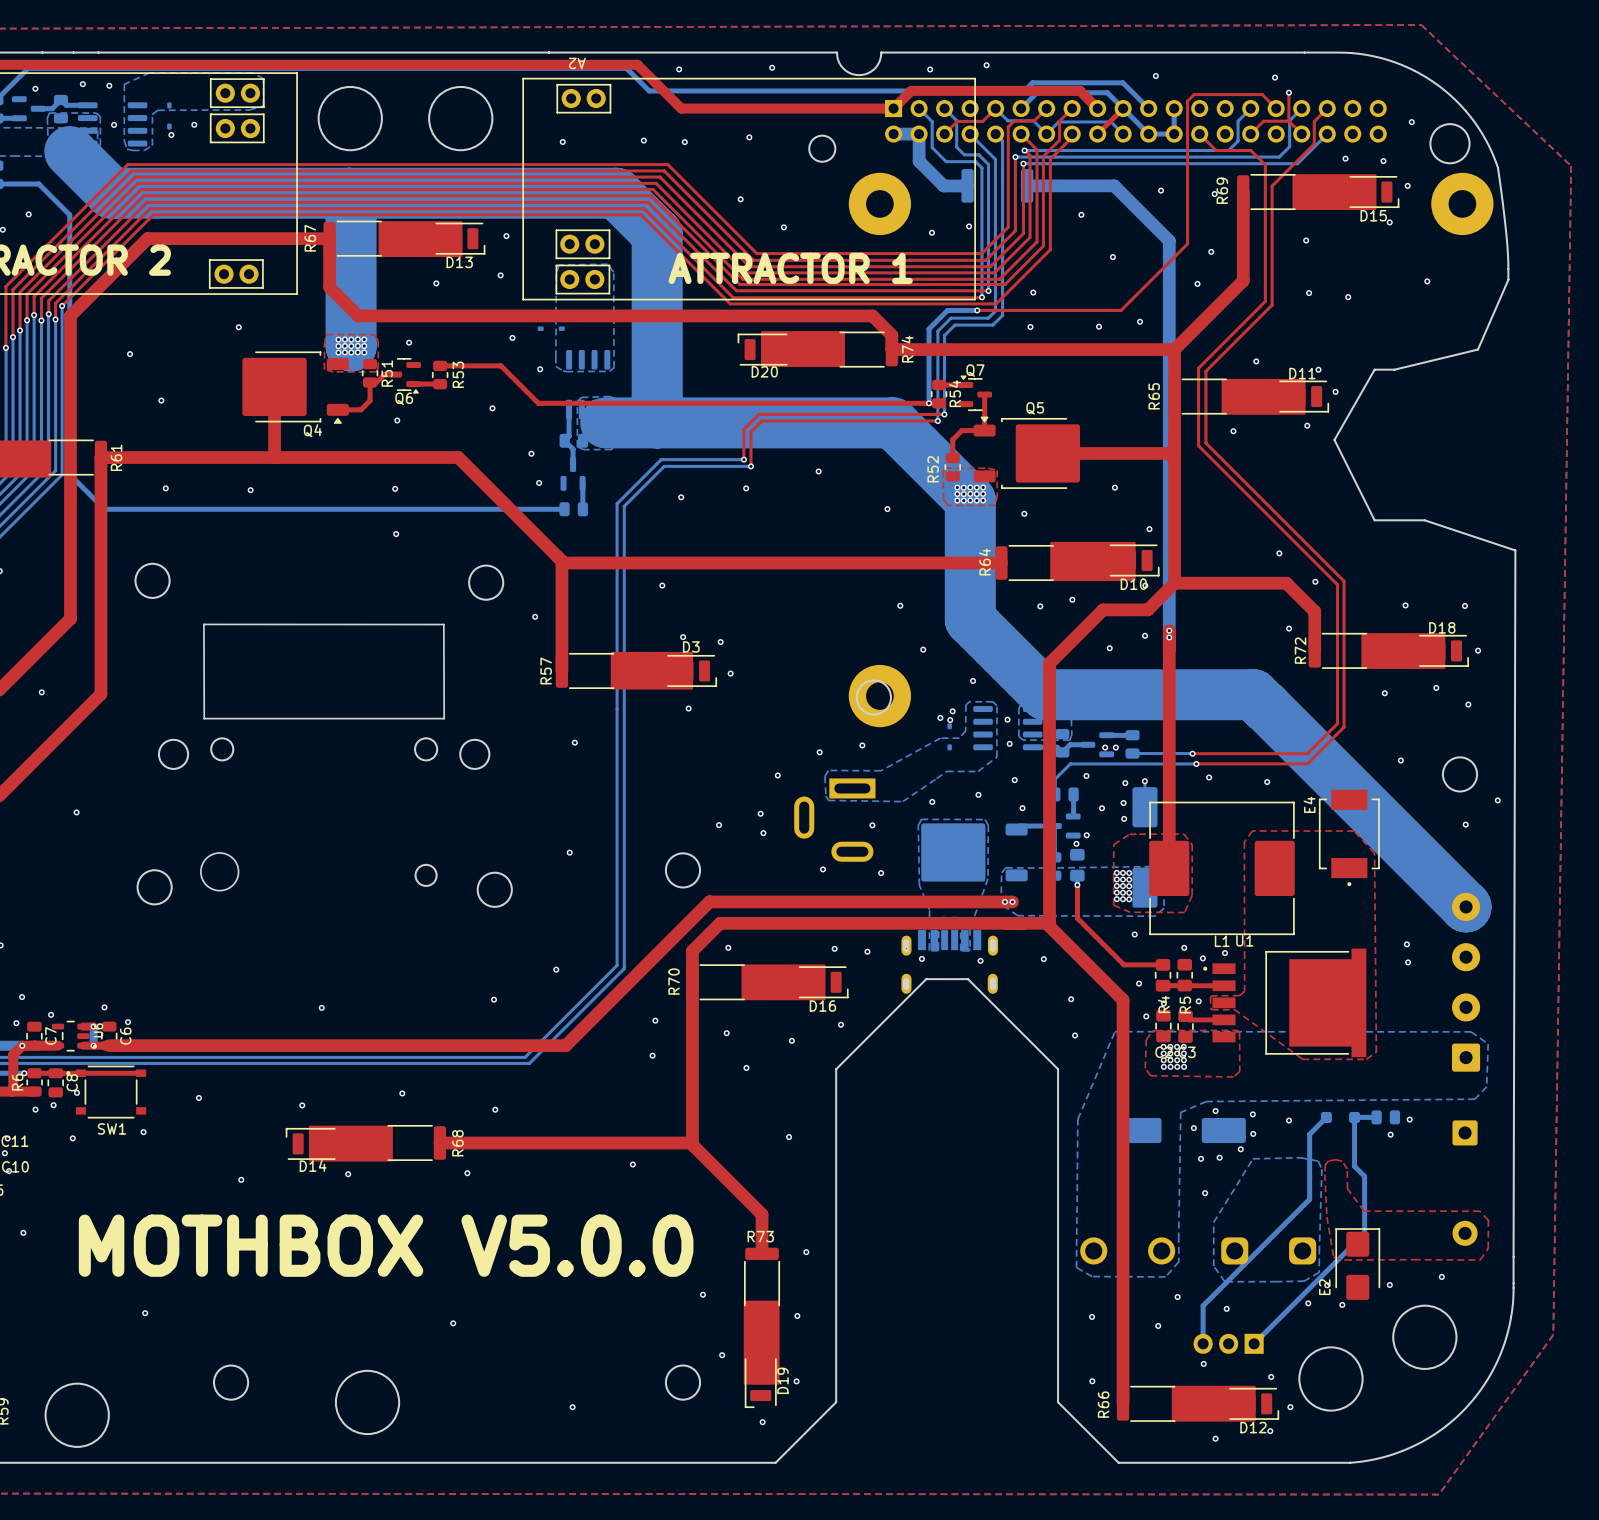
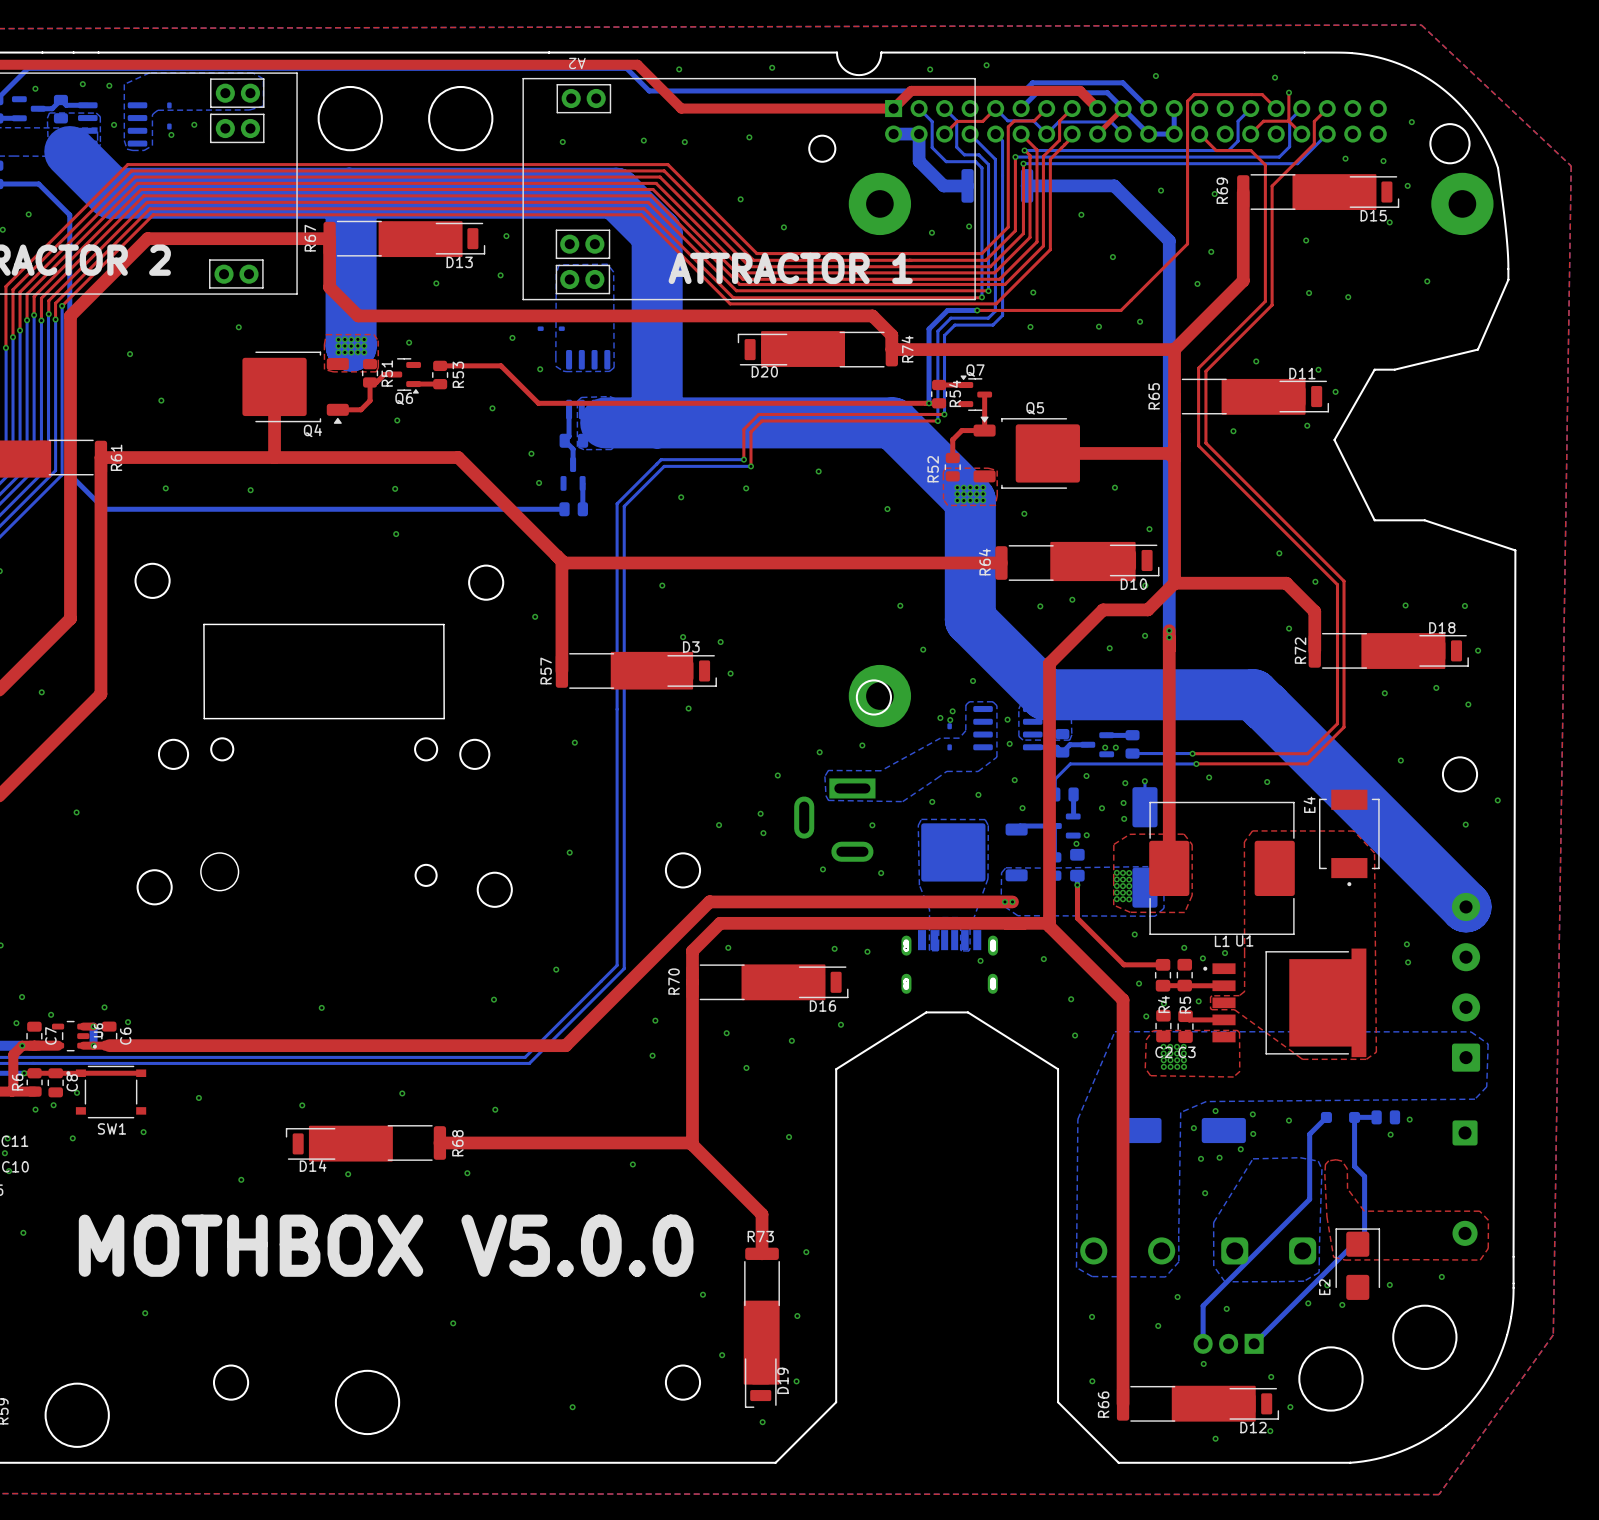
via: (921, 958) -> none
board edge: (836, 1069) (926, 979) (967, 979) (1058, 1069) -> (836, 1069) (926, 1012) (967, 1012) (1058, 1069)

